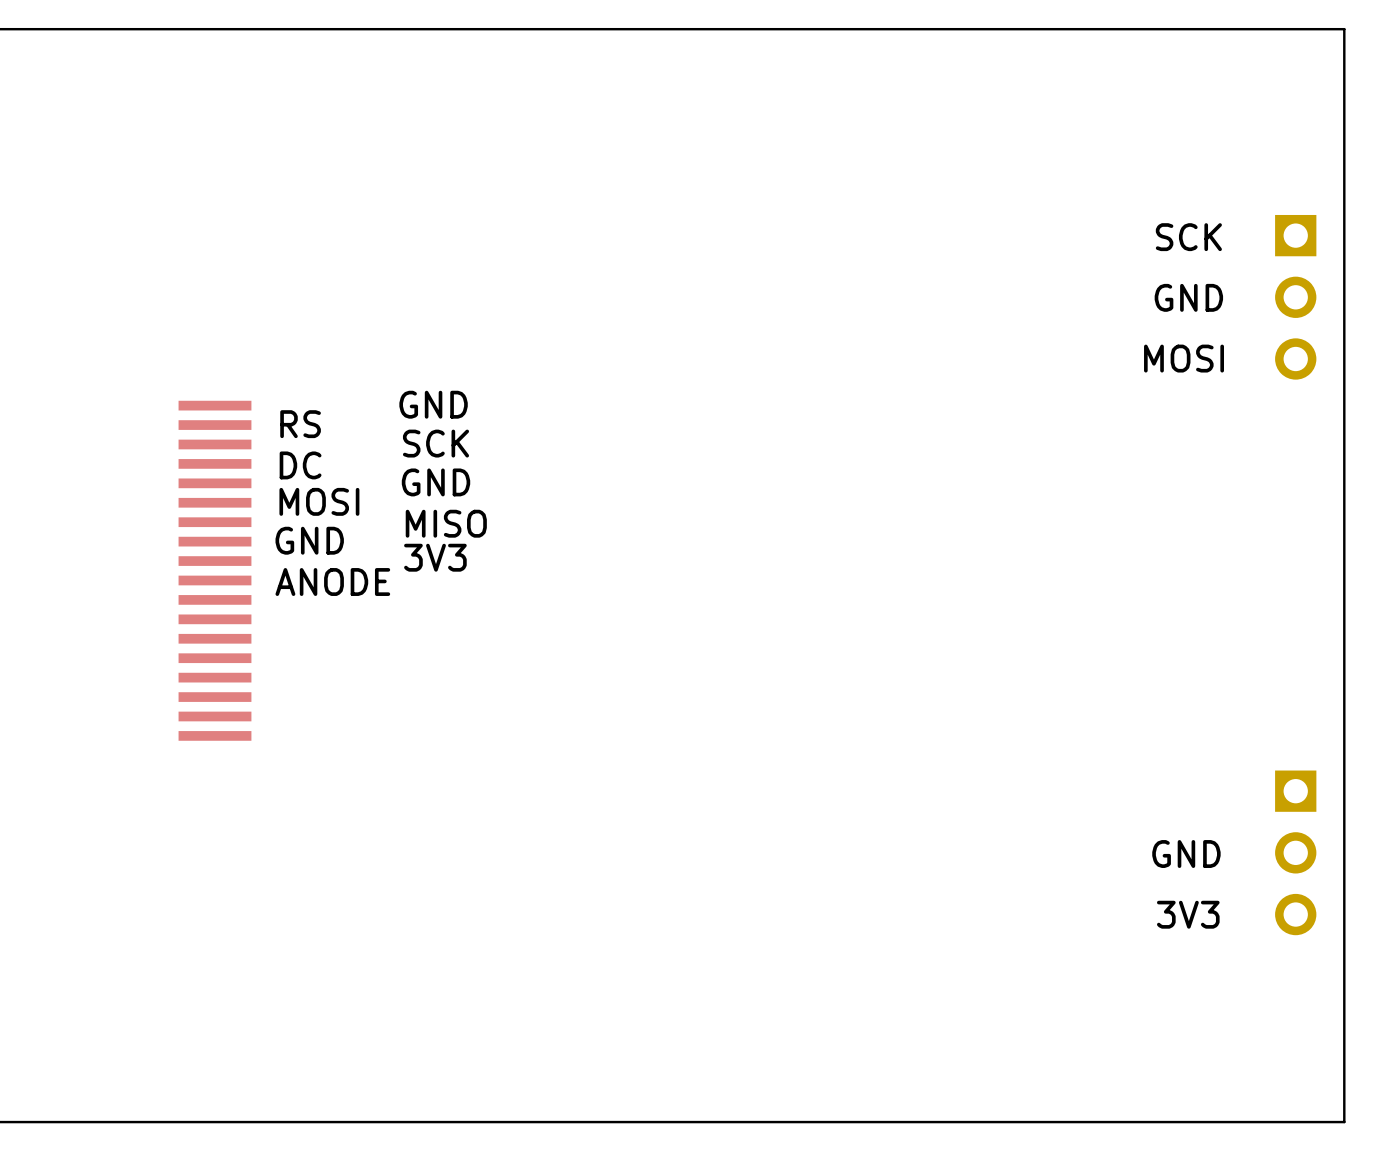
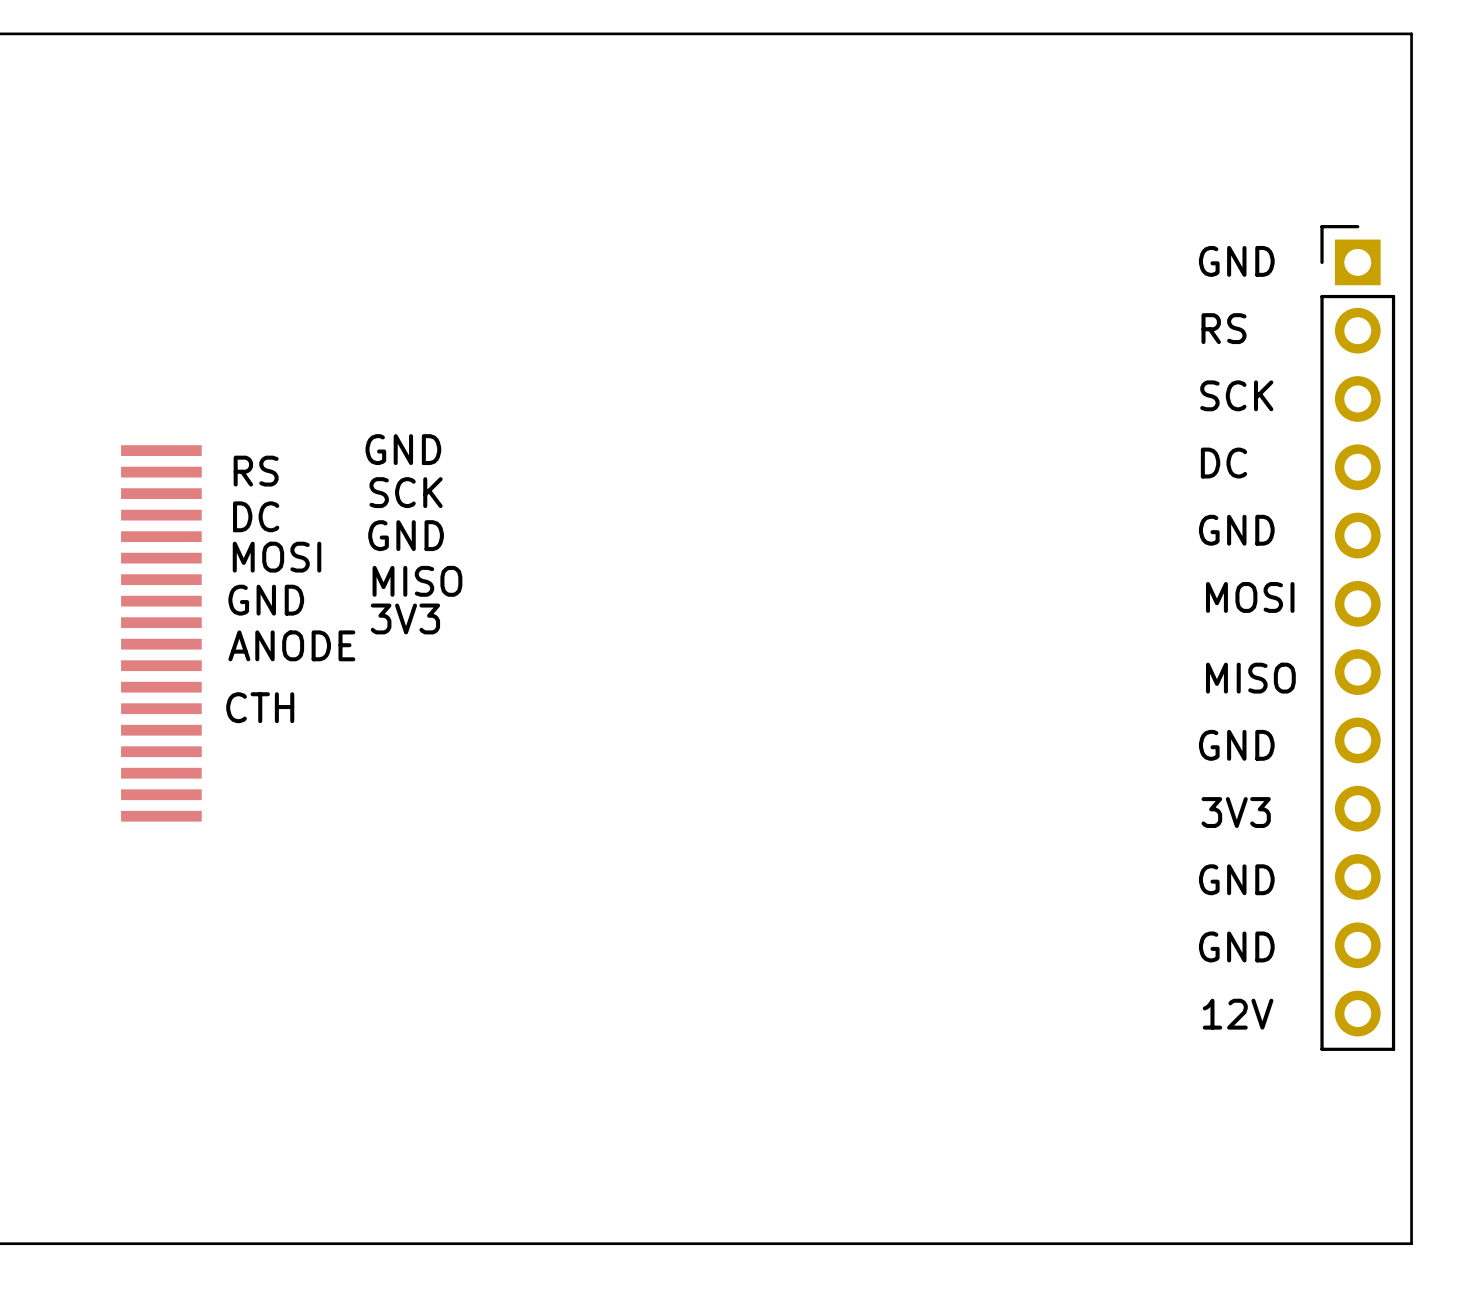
text position: SCK (1188, 237) -> SCK (1236, 395)
text: none -> RS (1223, 328)
text position: GND (1188, 297) -> GND (1236, 261)
text position: MOSI (1184, 358) -> MOSI (1250, 597)
text: none -> DC (1223, 463)
text: none -> GND (1236, 530)
part: none -> (1357, 637)
text: none -> MISO (1250, 678)
text: none -> CTH (260, 707)
text: none -> GND (1236, 745)
text: none -> 3V3 (1236, 812)
text: none -> GND (1236, 879)
part: (1295, 852) -> none
text: 3V3 (1188, 914) -> 12V (1238, 1014)

